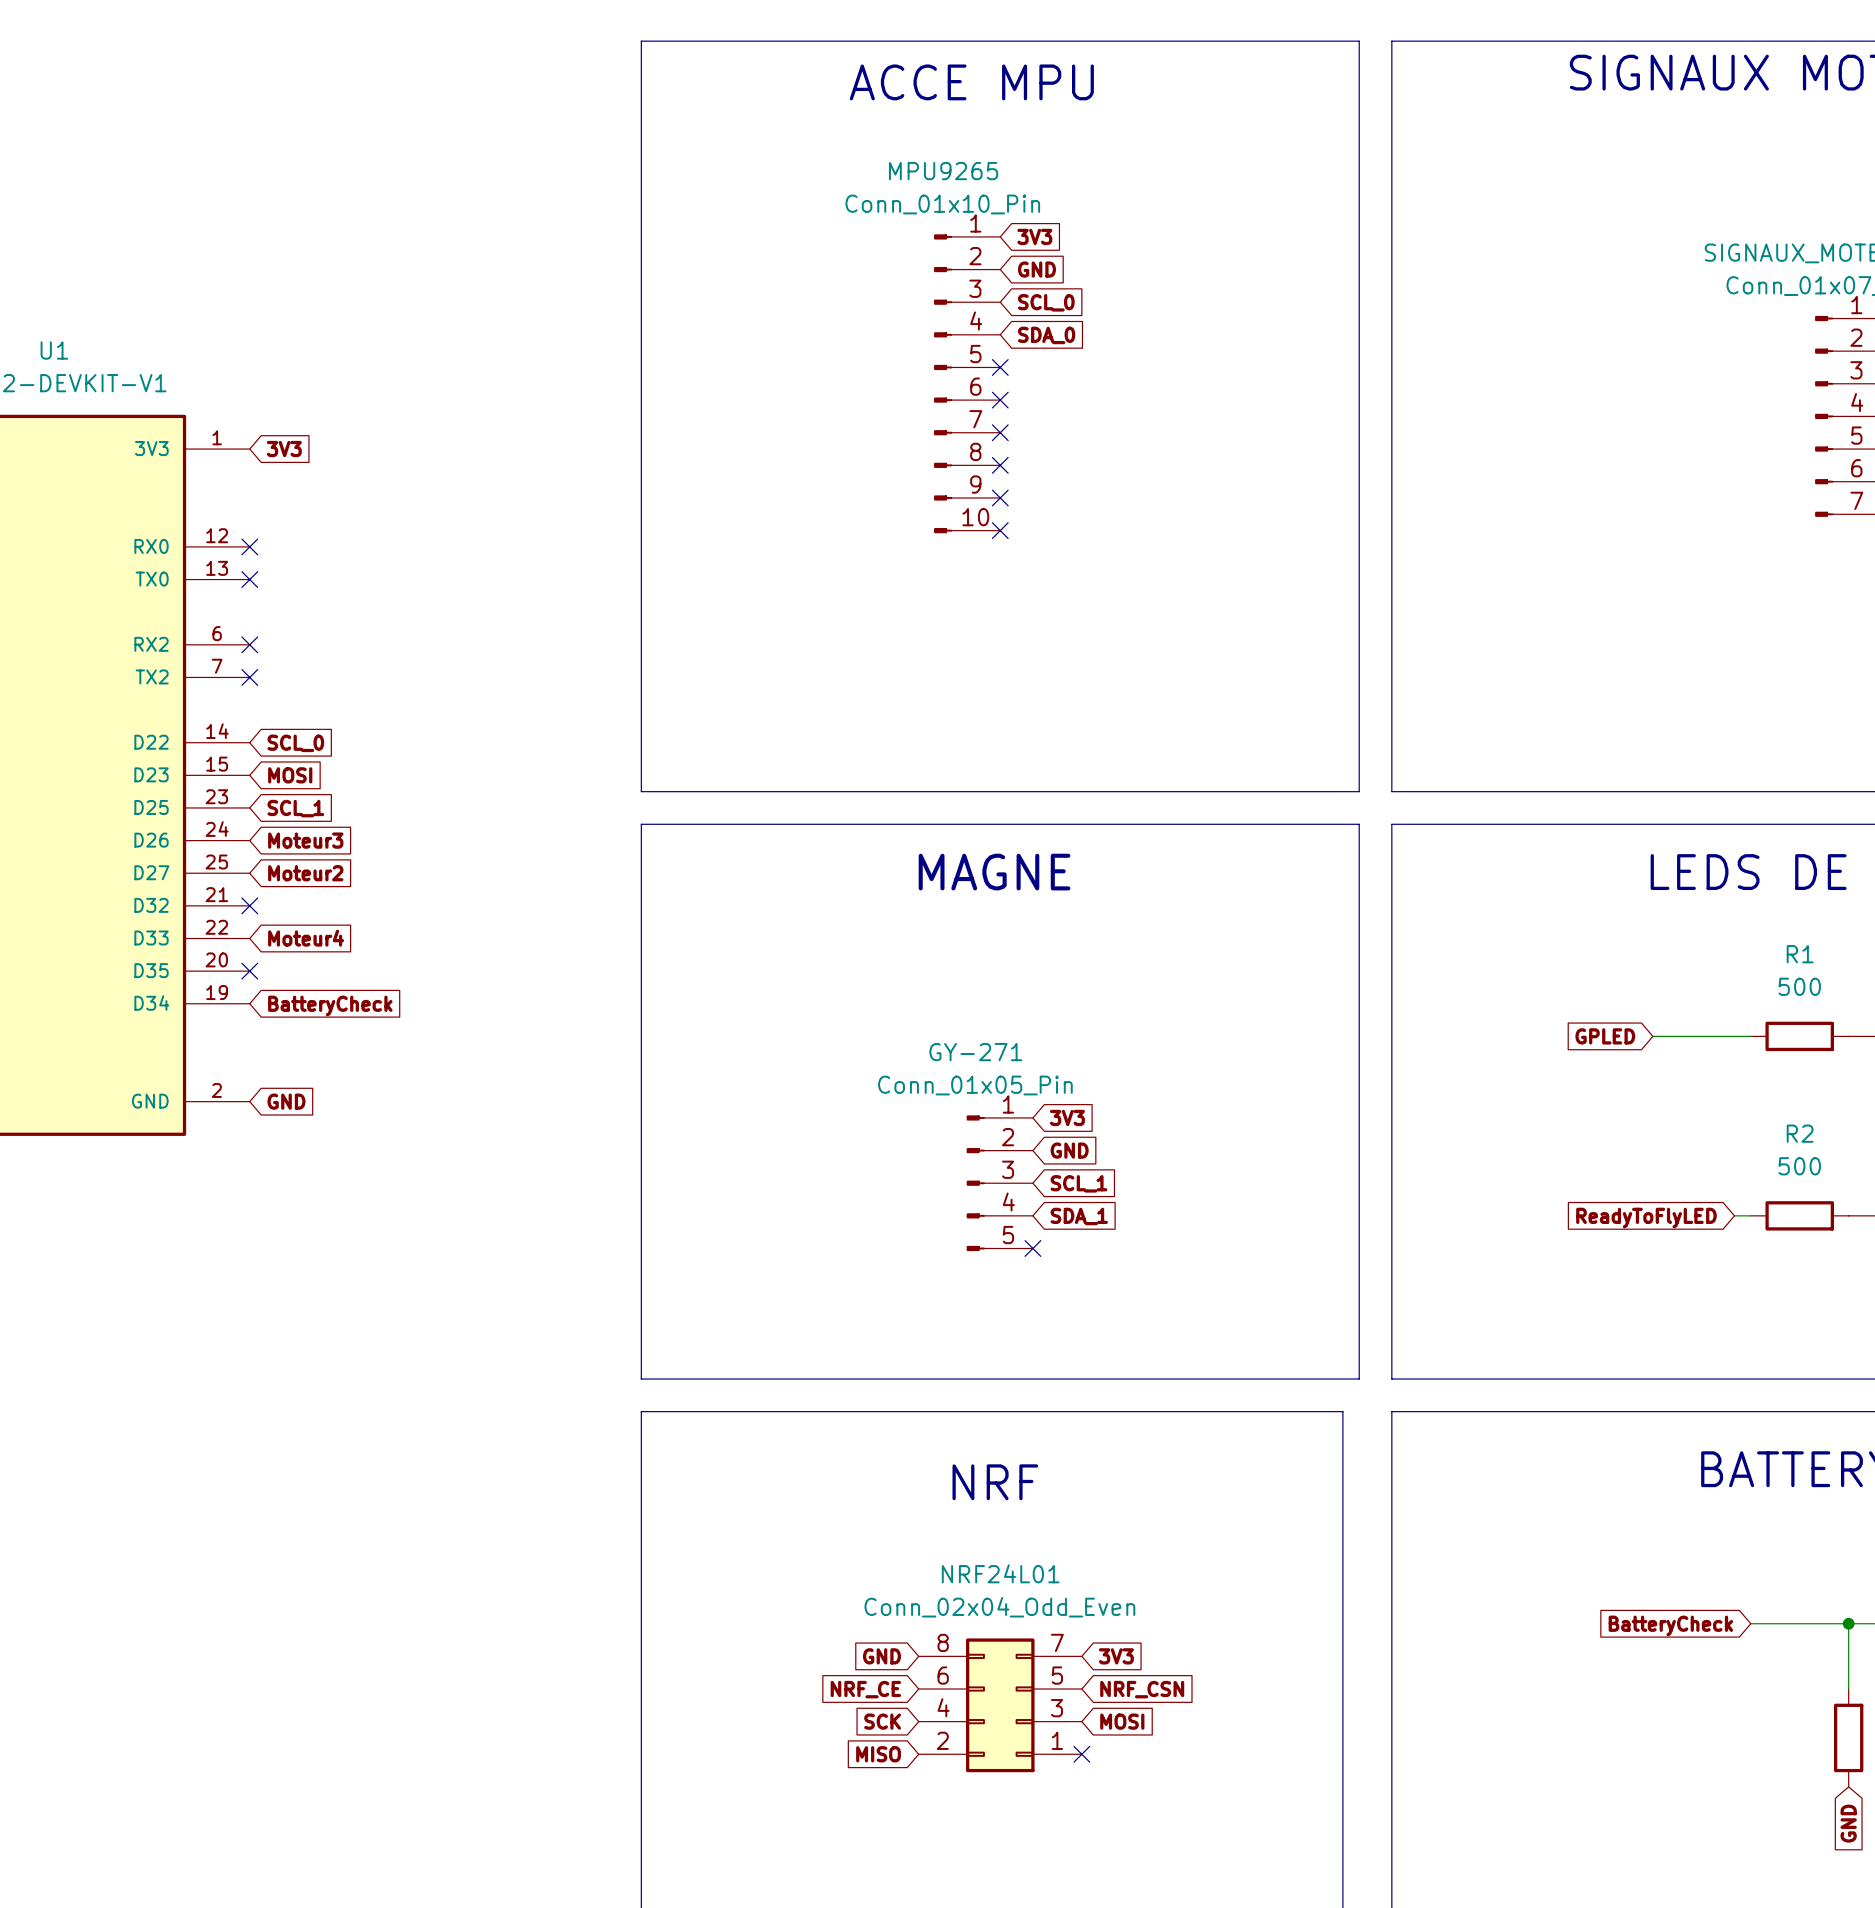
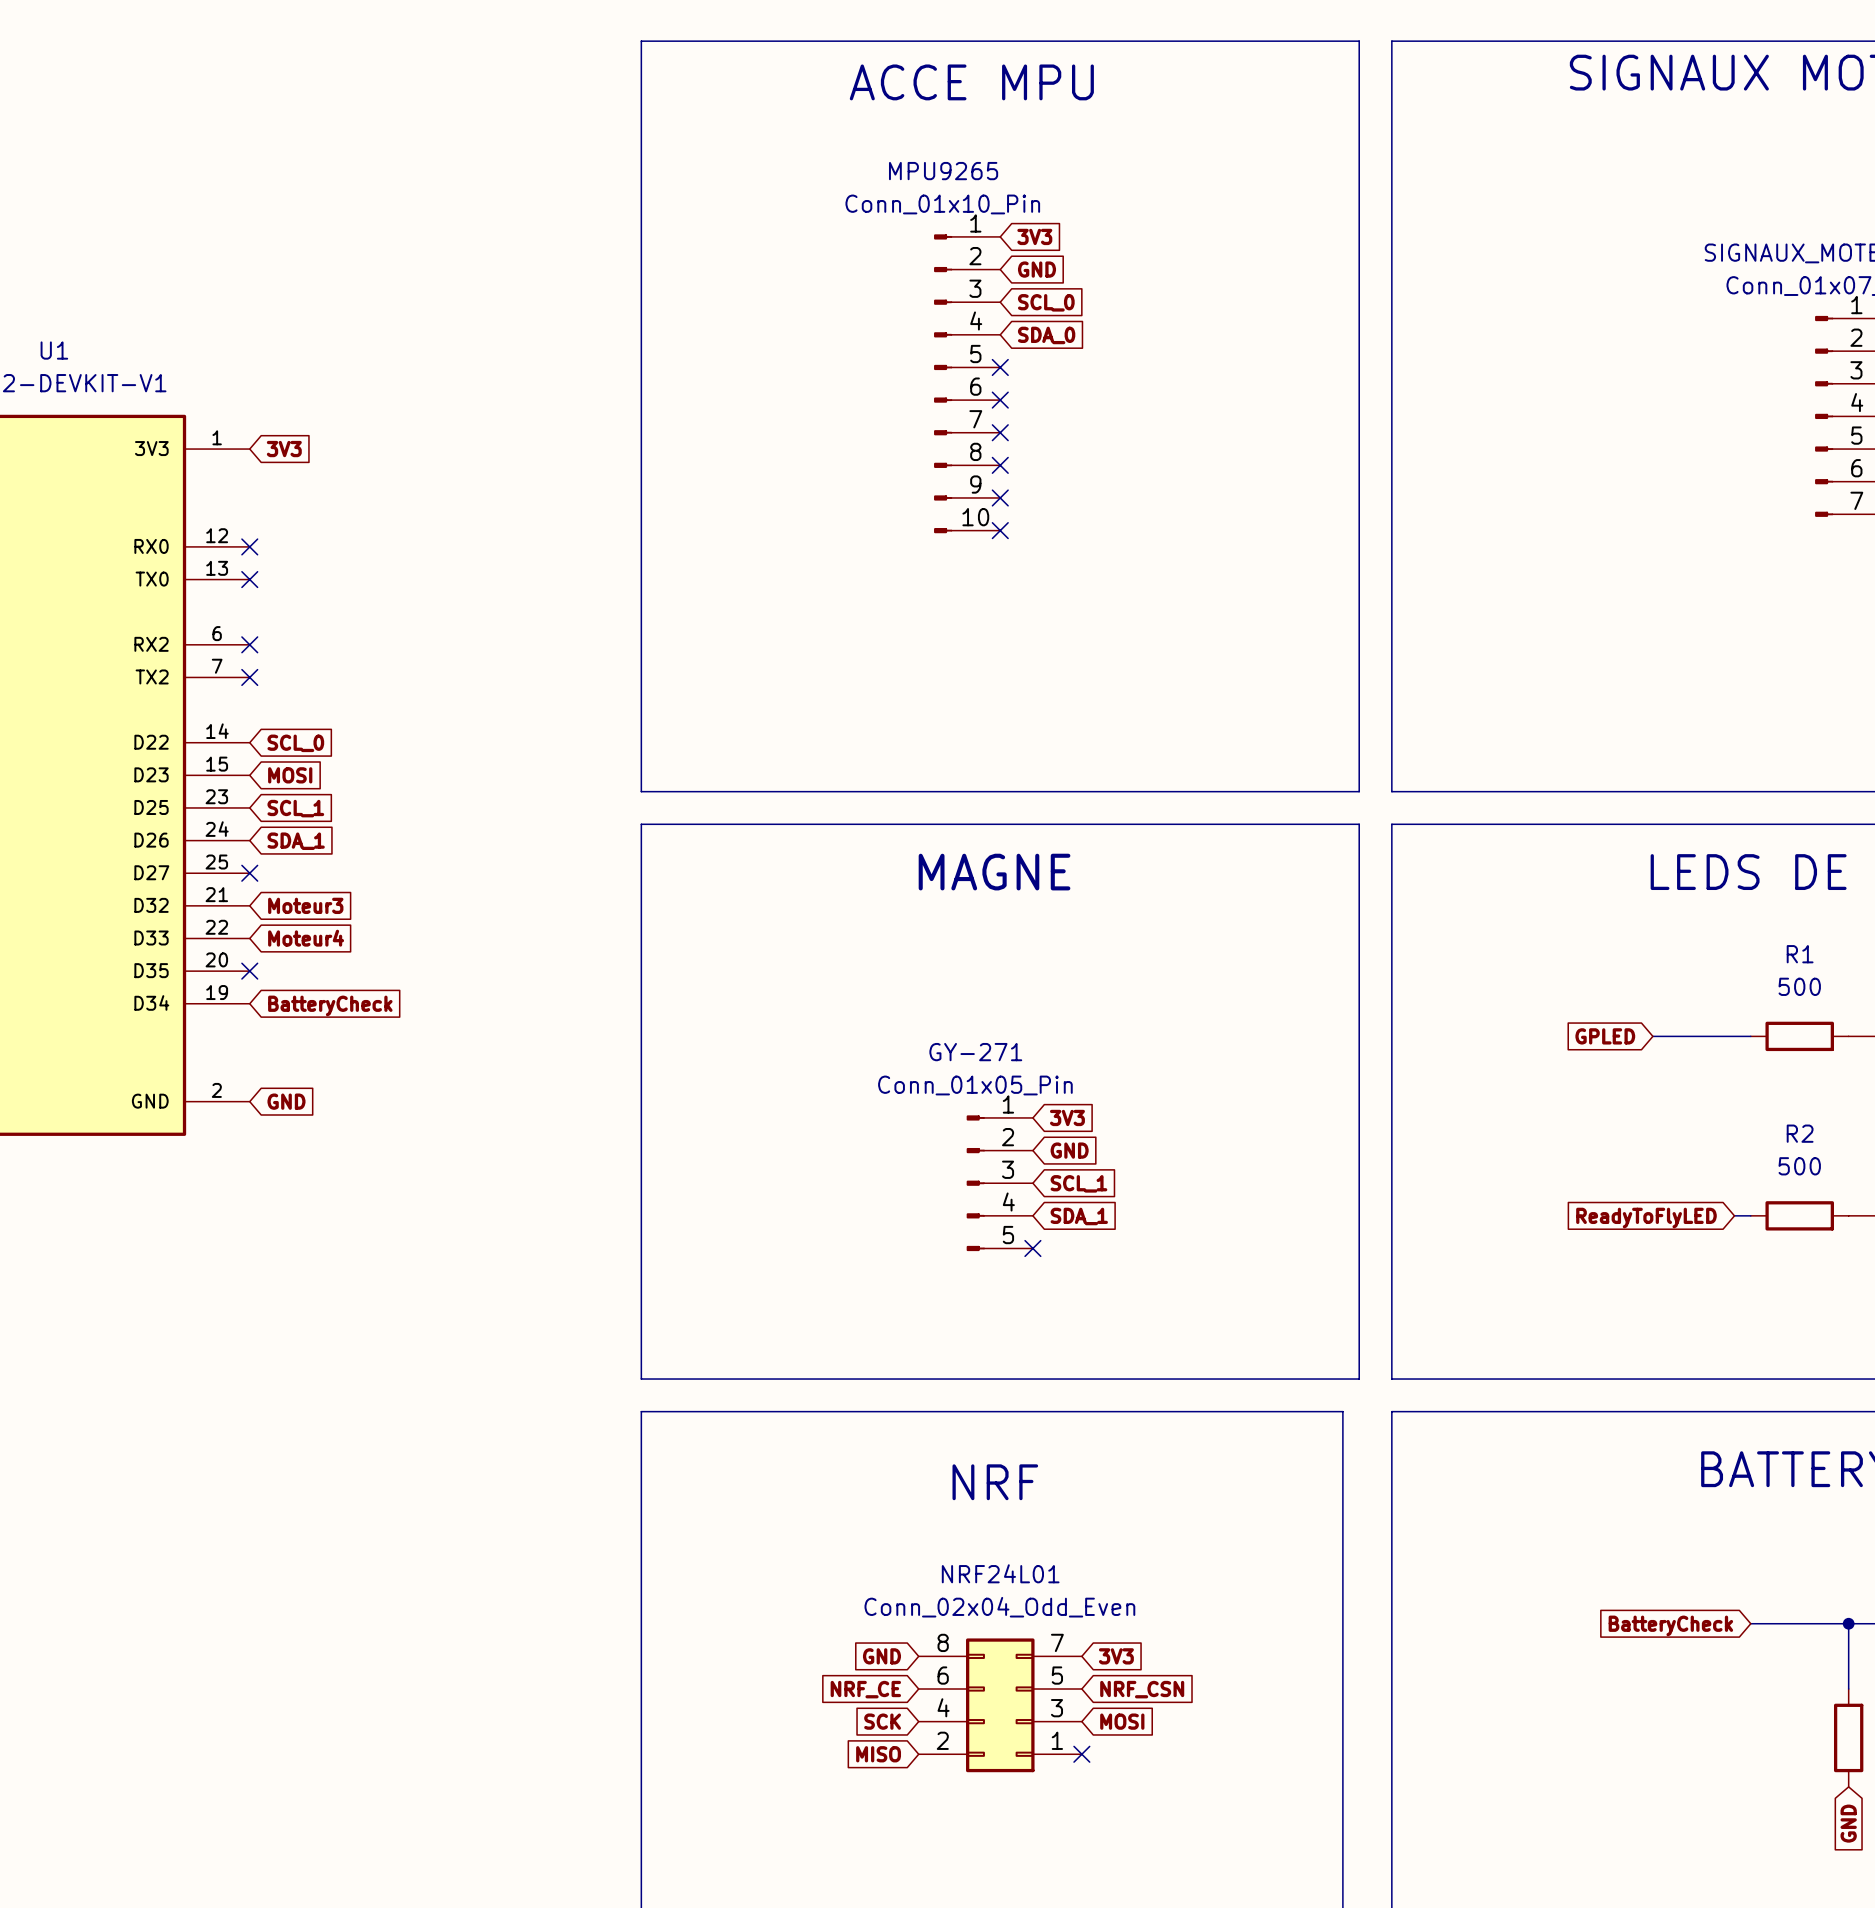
global label: Moteur3 (305, 840) -> SDA_1 (296, 841)
global label: Moteur2 (305, 873) -> none
no-connect mark position: (249, 905) -> (249, 873)
global label: none -> Moteur3 (305, 905)

